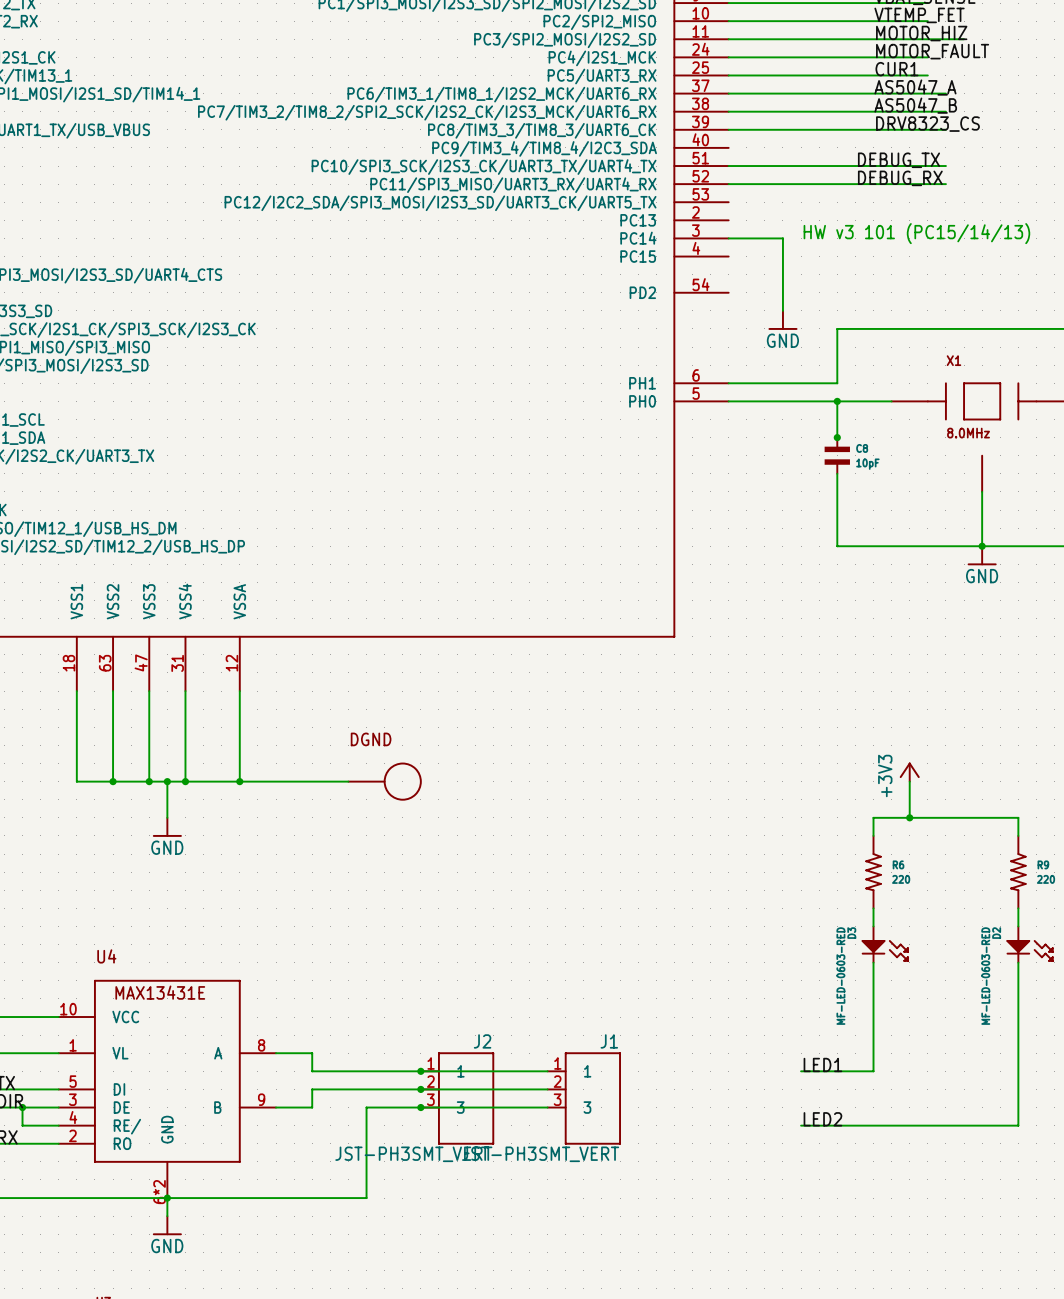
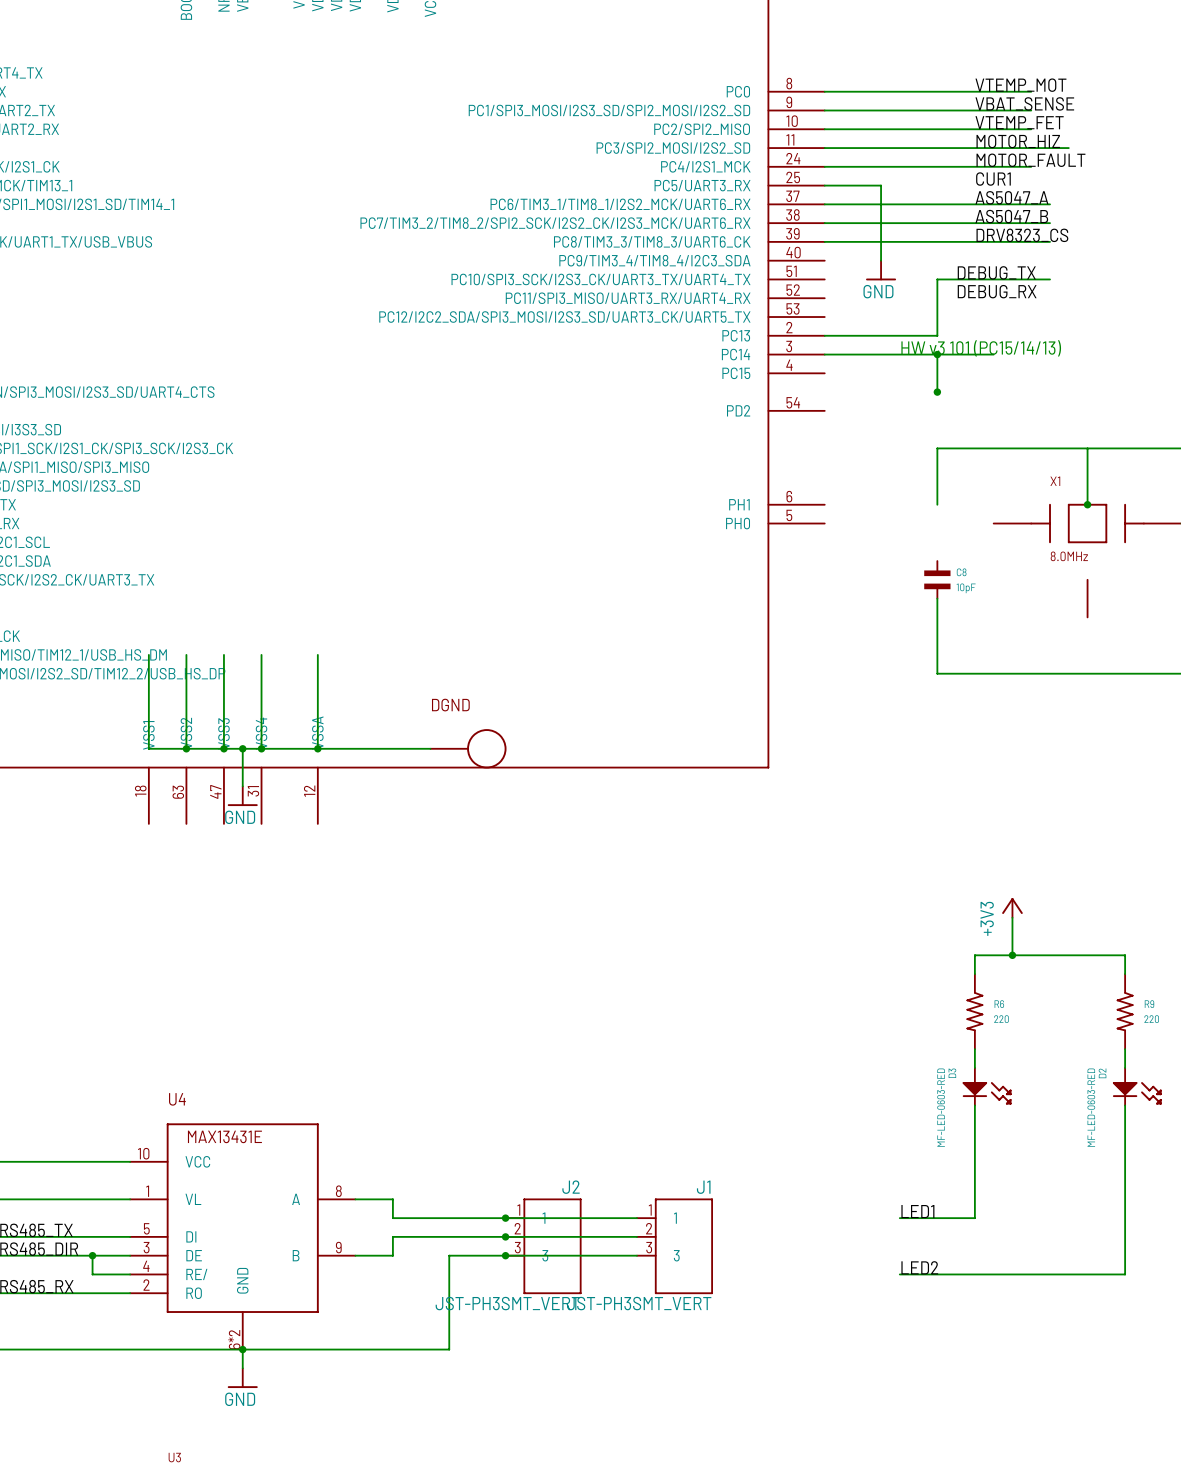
wire: (782, 75) (927, 75) -> (881, 185) (881, 260)
wire: (728, 166) (837, 166) -> (824, 335) (937, 335) (937, 279)
wire: (728, 184) (945, 184) -> none
wire: (782, 238) (782, 310) -> (881, 354) (993, 354)
junction: none -> (937, 354)
junction: none -> (937, 392)
power symbol position: GND (782, 320) -> GND (881, 270)
wire: (728, 383) (837, 383) -> none
junction: none -> (1087, 504)
wire: (728, 401) (891, 401) -> none
wire: (837, 401) (837, 437) -> (937, 354) (937, 392)
junction: (837, 401) -> none
junction: (837, 437) -> none
wire: (982, 491) (982, 546) -> (1087, 448) (1087, 504)
junction: (982, 546) -> none
power symbol: GND (982, 555) -> none
junction: none -> (186, 748)
junction: none -> (223, 748)
junction: none -> (242, 748)
junction: none -> (261, 748)
junction: none -> (317, 748)
wire: (76, 691) (76, 781) (348, 781) -> (148, 654) (148, 748) (430, 748)
wire: (113, 691) (113, 781) -> (186, 654) (186, 748)
wire: (149, 691) (149, 781) -> (223, 654) (223, 748)
wire: (185, 691) (185, 781) -> (261, 654) (261, 748)
wire: (239, 691) (239, 781) -> (317, 654) (317, 748)
junction: (113, 781) -> none
junction: (149, 781) -> none
wire: (167, 781) (167, 817) -> (242, 748) (242, 786)
junction: (167, 781) -> none
junction: (185, 781) -> none
junction: (239, 781) -> none
DGND position: (385, 781) -> (468, 748)
power symbol position: GND (167, 827) -> GND (242, 796)

